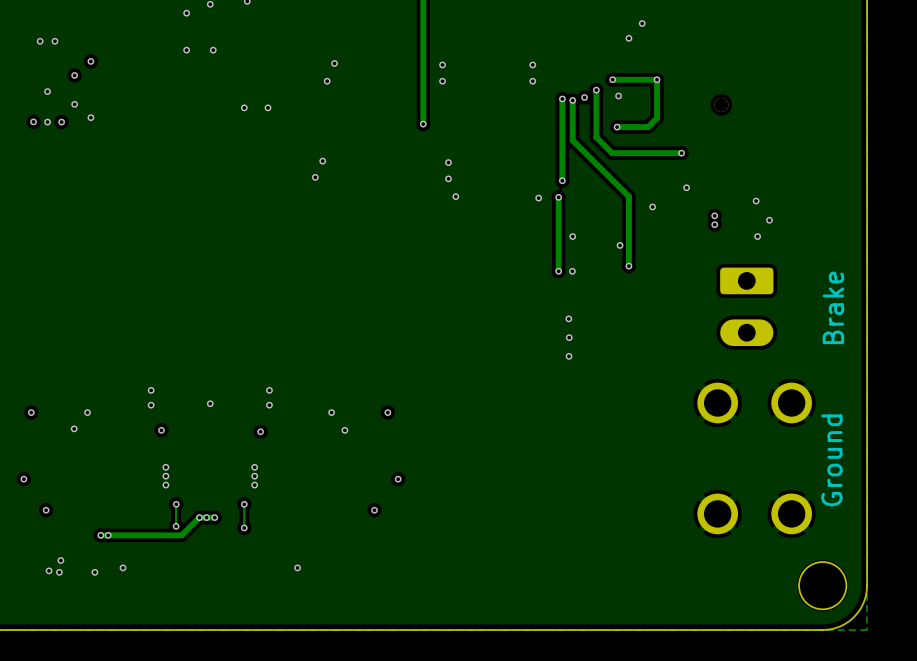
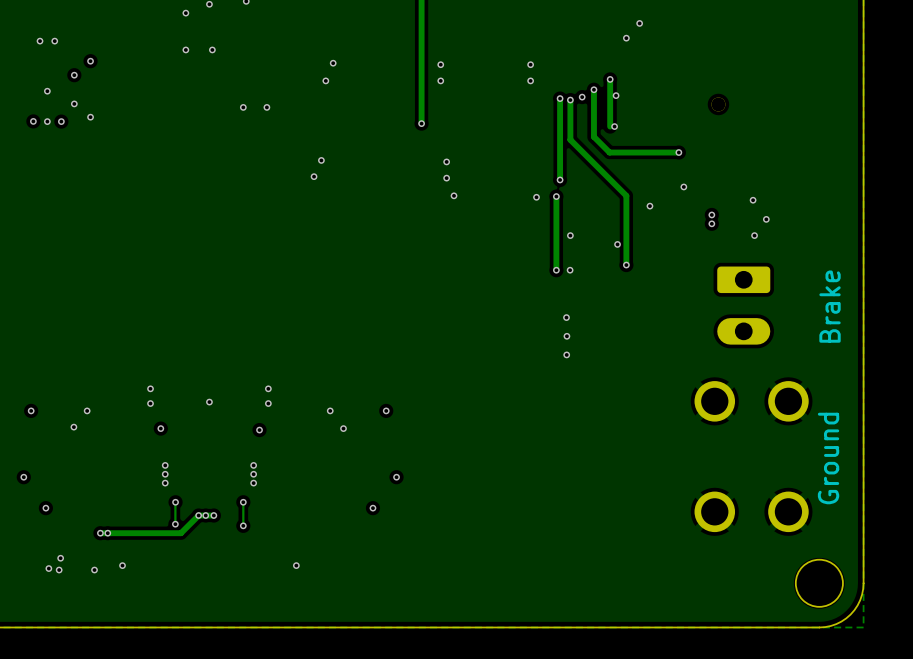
track: (612, 79) (657, 79) (657, 118) (648, 127) (617, 127) -> (610, 79) (610, 126)
via: (657, 79) -> none

